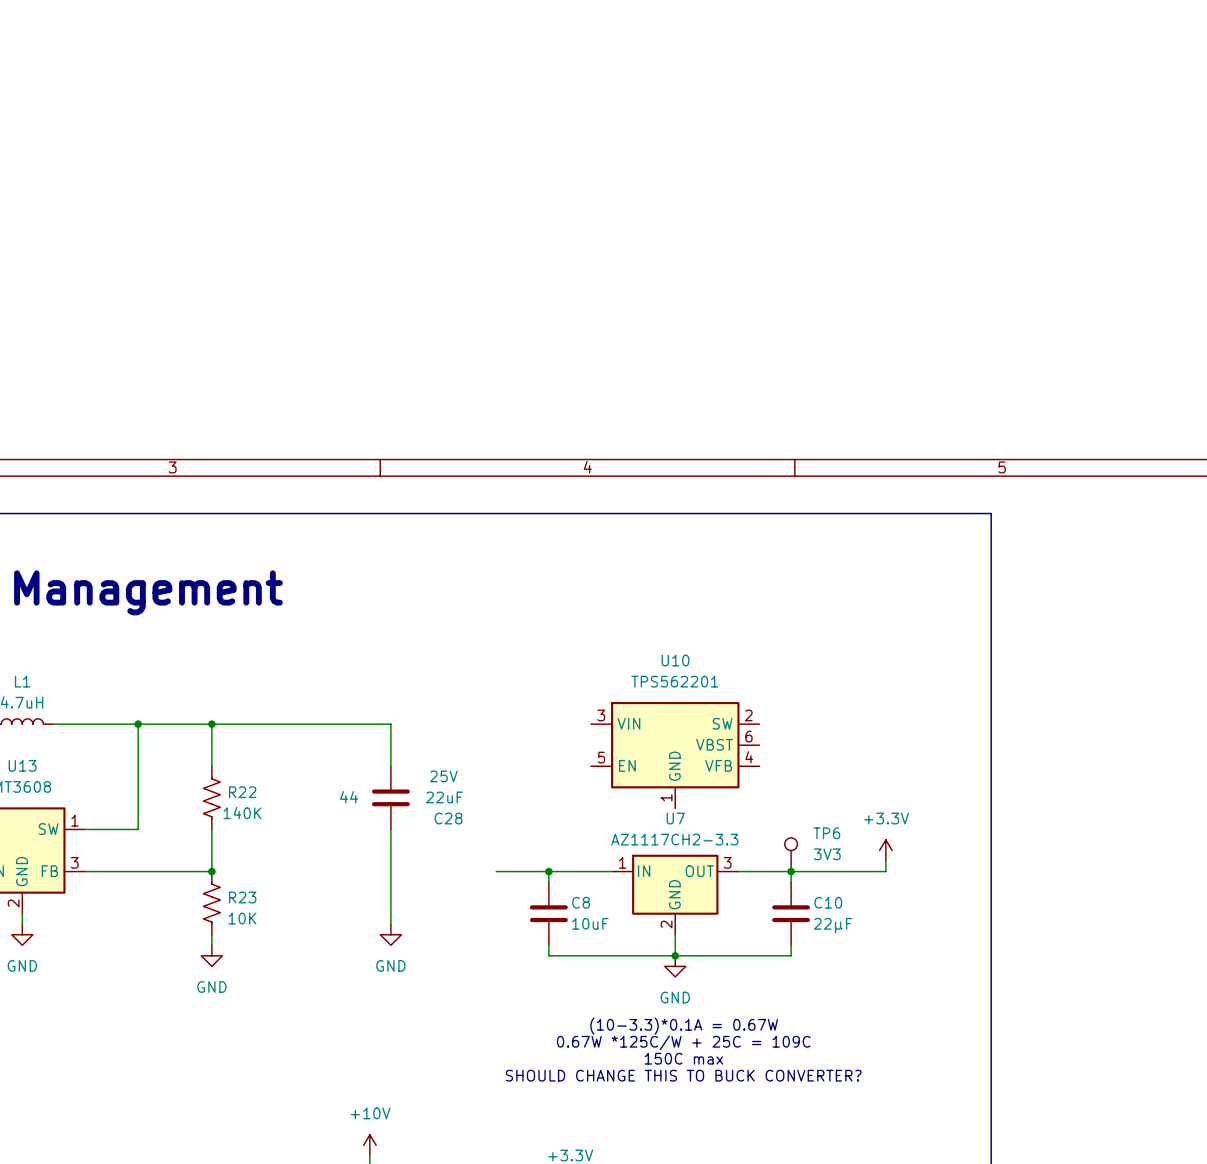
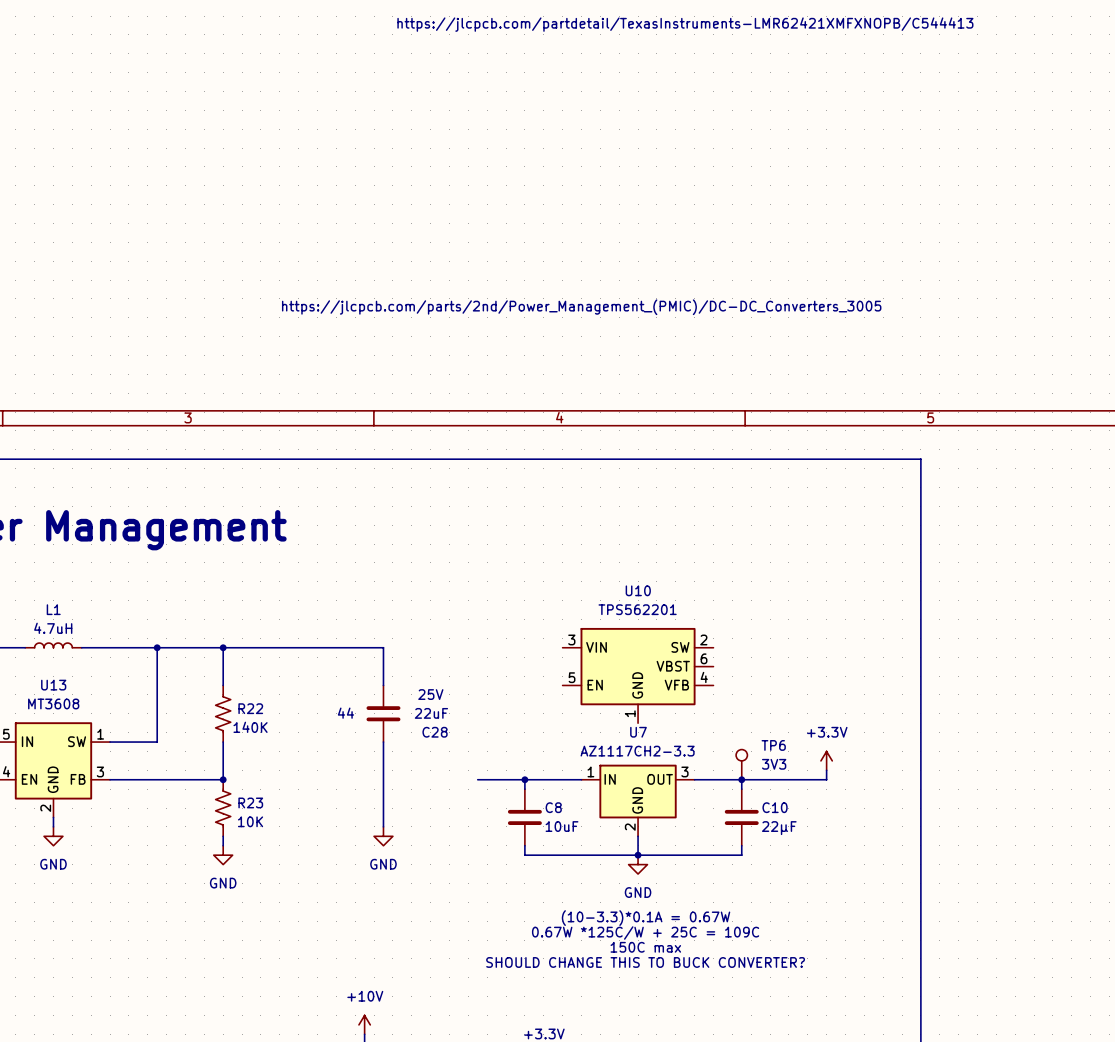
text: none -> https://jlcpcb.com/partdetail/TexasInstruments-LMR62421XMFXNOPB/C544413 (685, 24)
text: none -> https://jlcpcb.com/parts/2nd/Power_Management_(PMIC)/DC-DC_Converters_3005 (581, 307)

